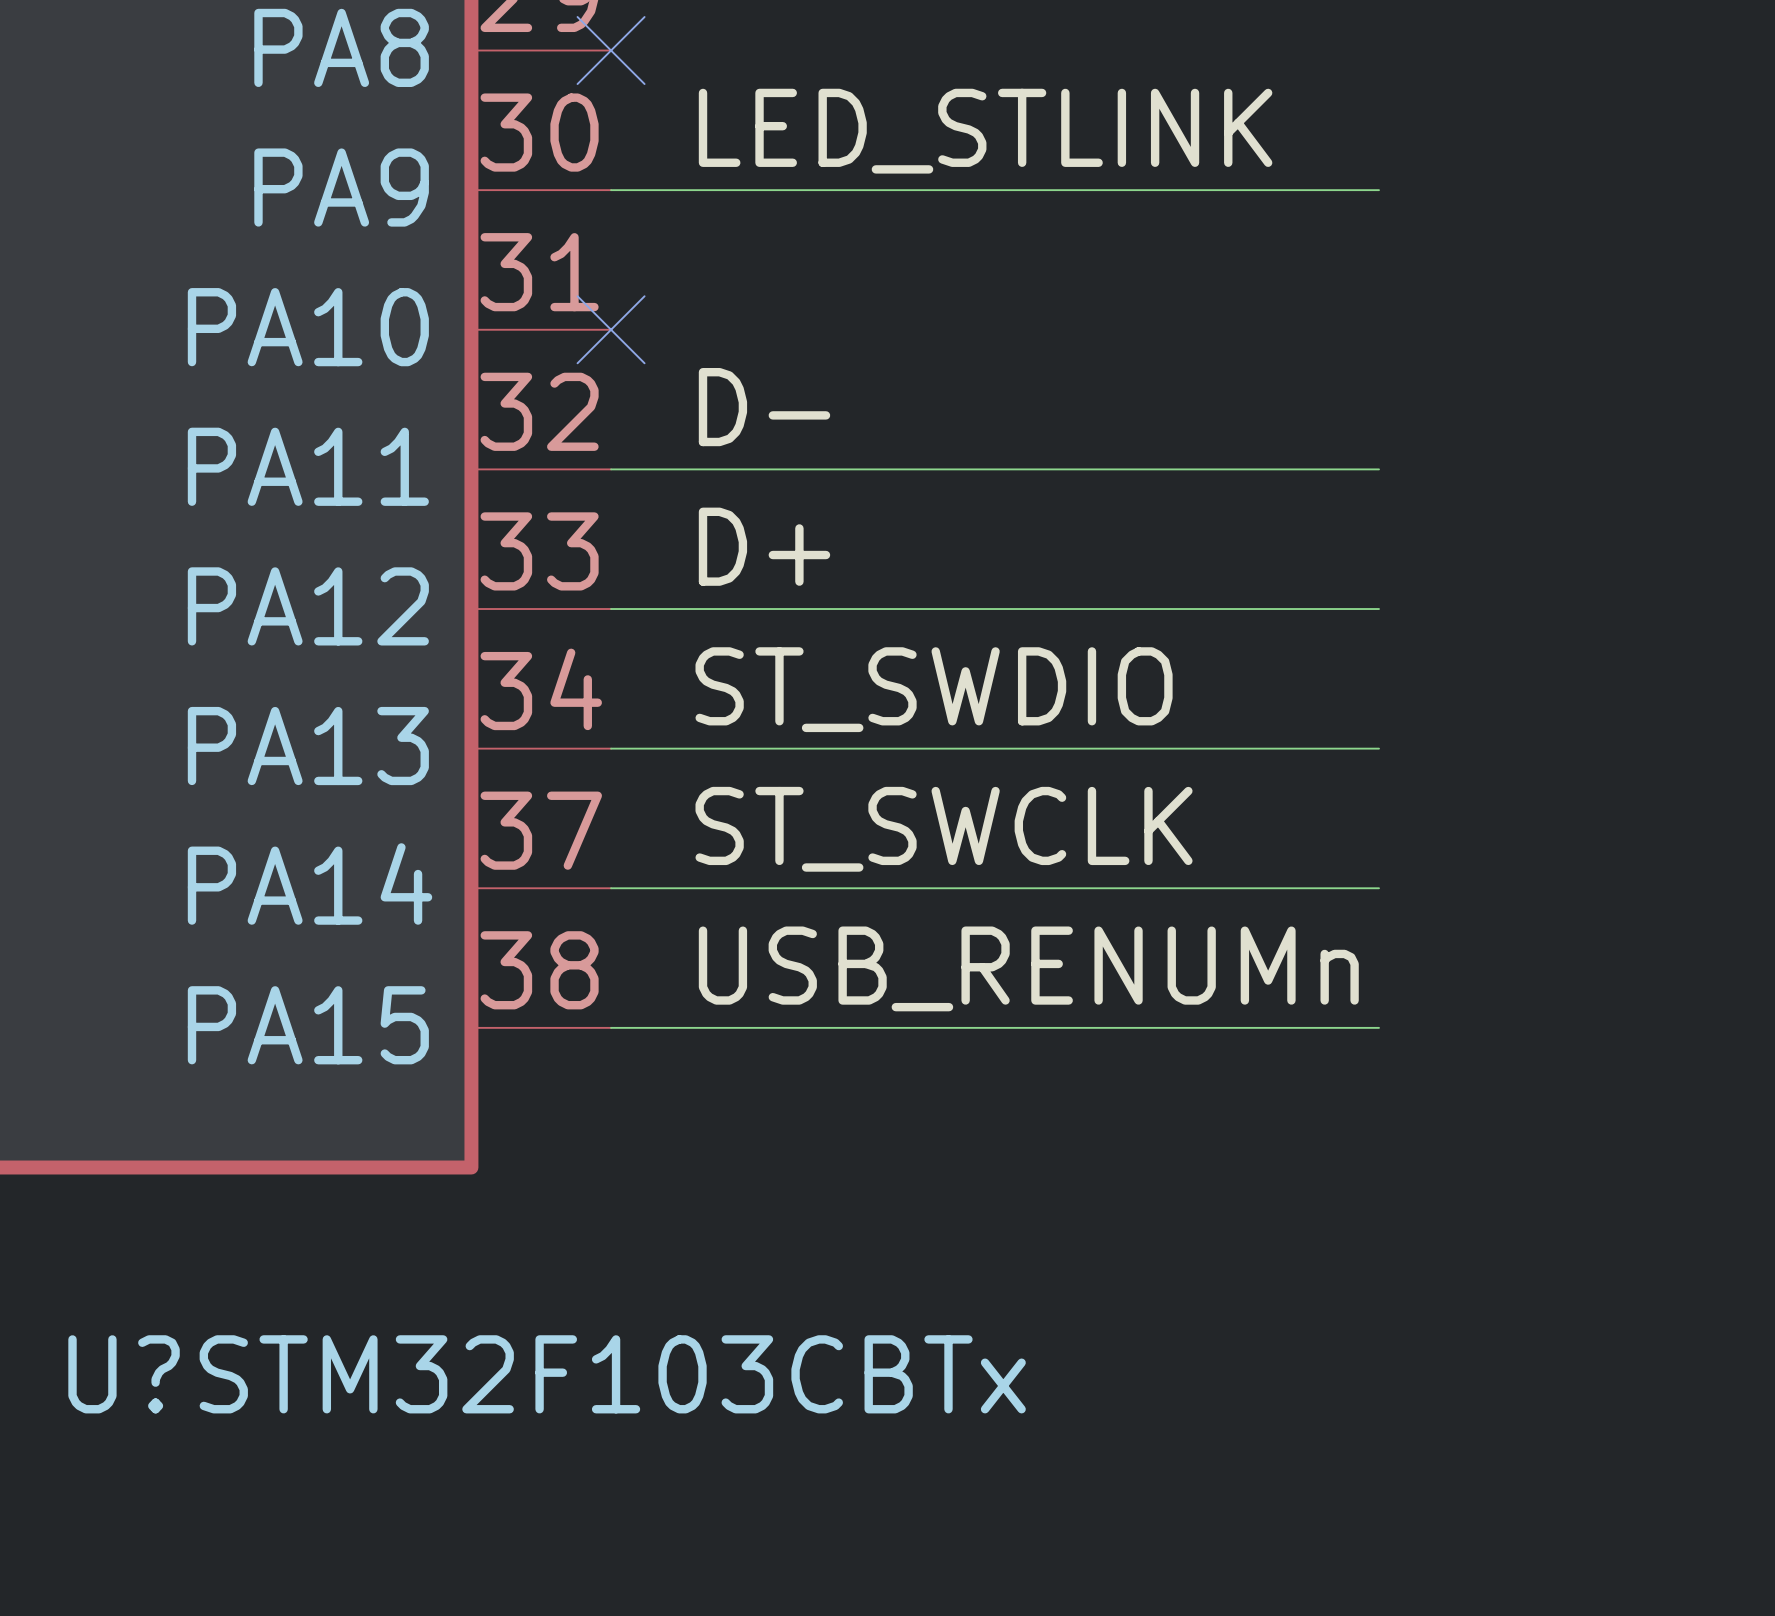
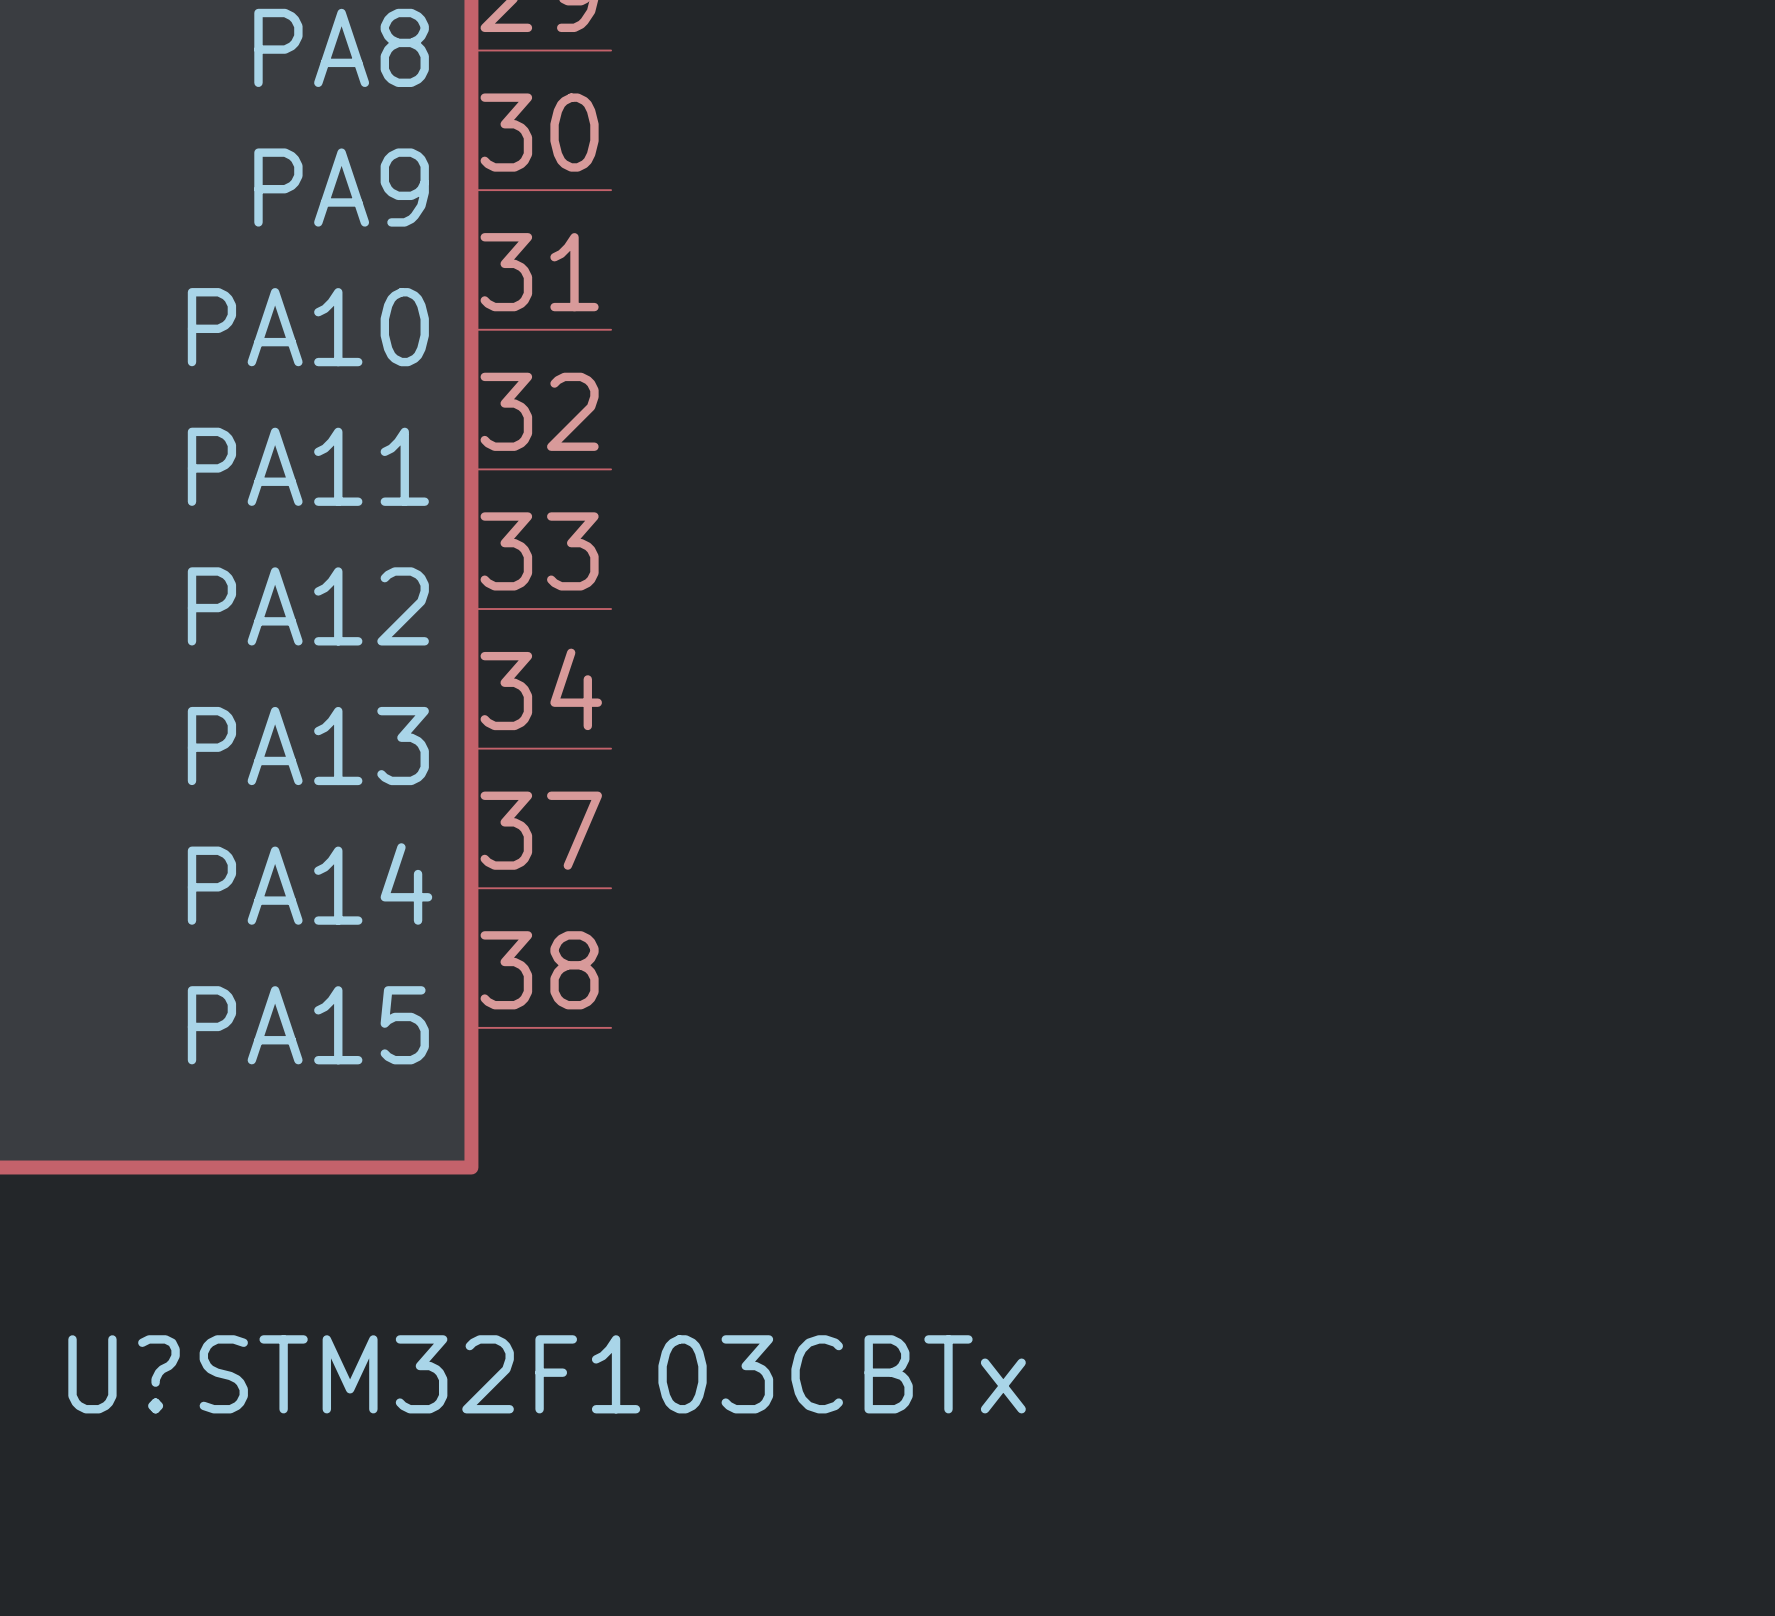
no-connect mark: (611, 50) -> none
label: LED_STLINK (985, 131) -> none
wire: (611, 190) (1378, 190) -> none
no-connect mark: (611, 329) -> none
label: D- (764, 407) -> none
wire: (611, 469) (1378, 469) -> none
label: D+ (764, 546) -> none
wire: (611, 609) (1378, 609) -> none
label: ST_SWDIO (934, 689) -> none
wire: (611, 748) (1378, 748) -> none
label: ST_SWCLK (944, 829) -> none
wire: (611, 888) (1378, 888) -> none
label: USB_RENUMn (1028, 968) -> none
wire: (611, 1027) (1378, 1027) -> none

